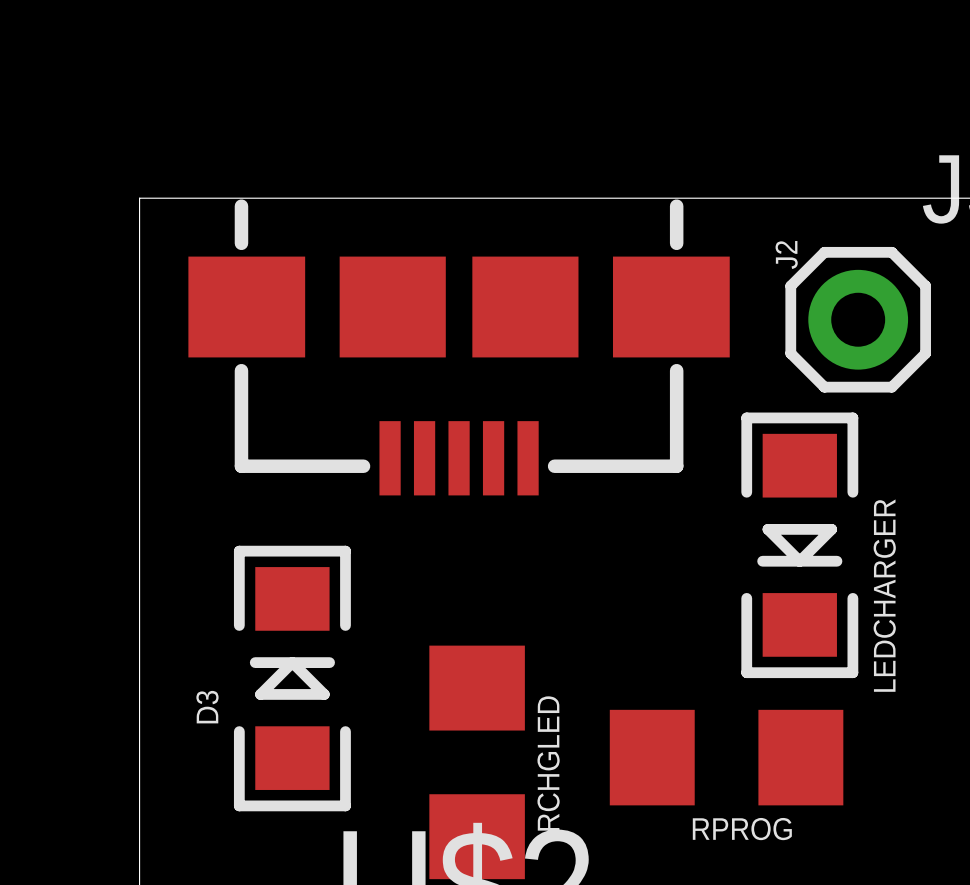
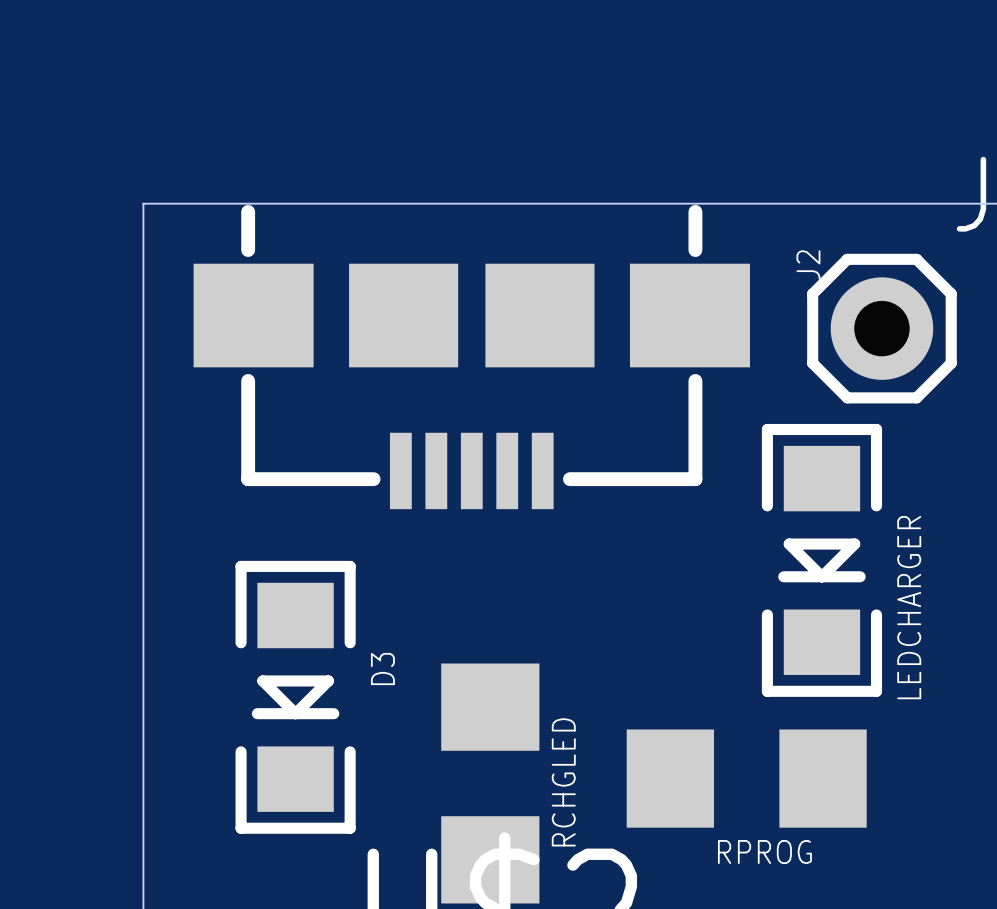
D3 rotation: 0° (292, 678) -> 180° (295, 697)

